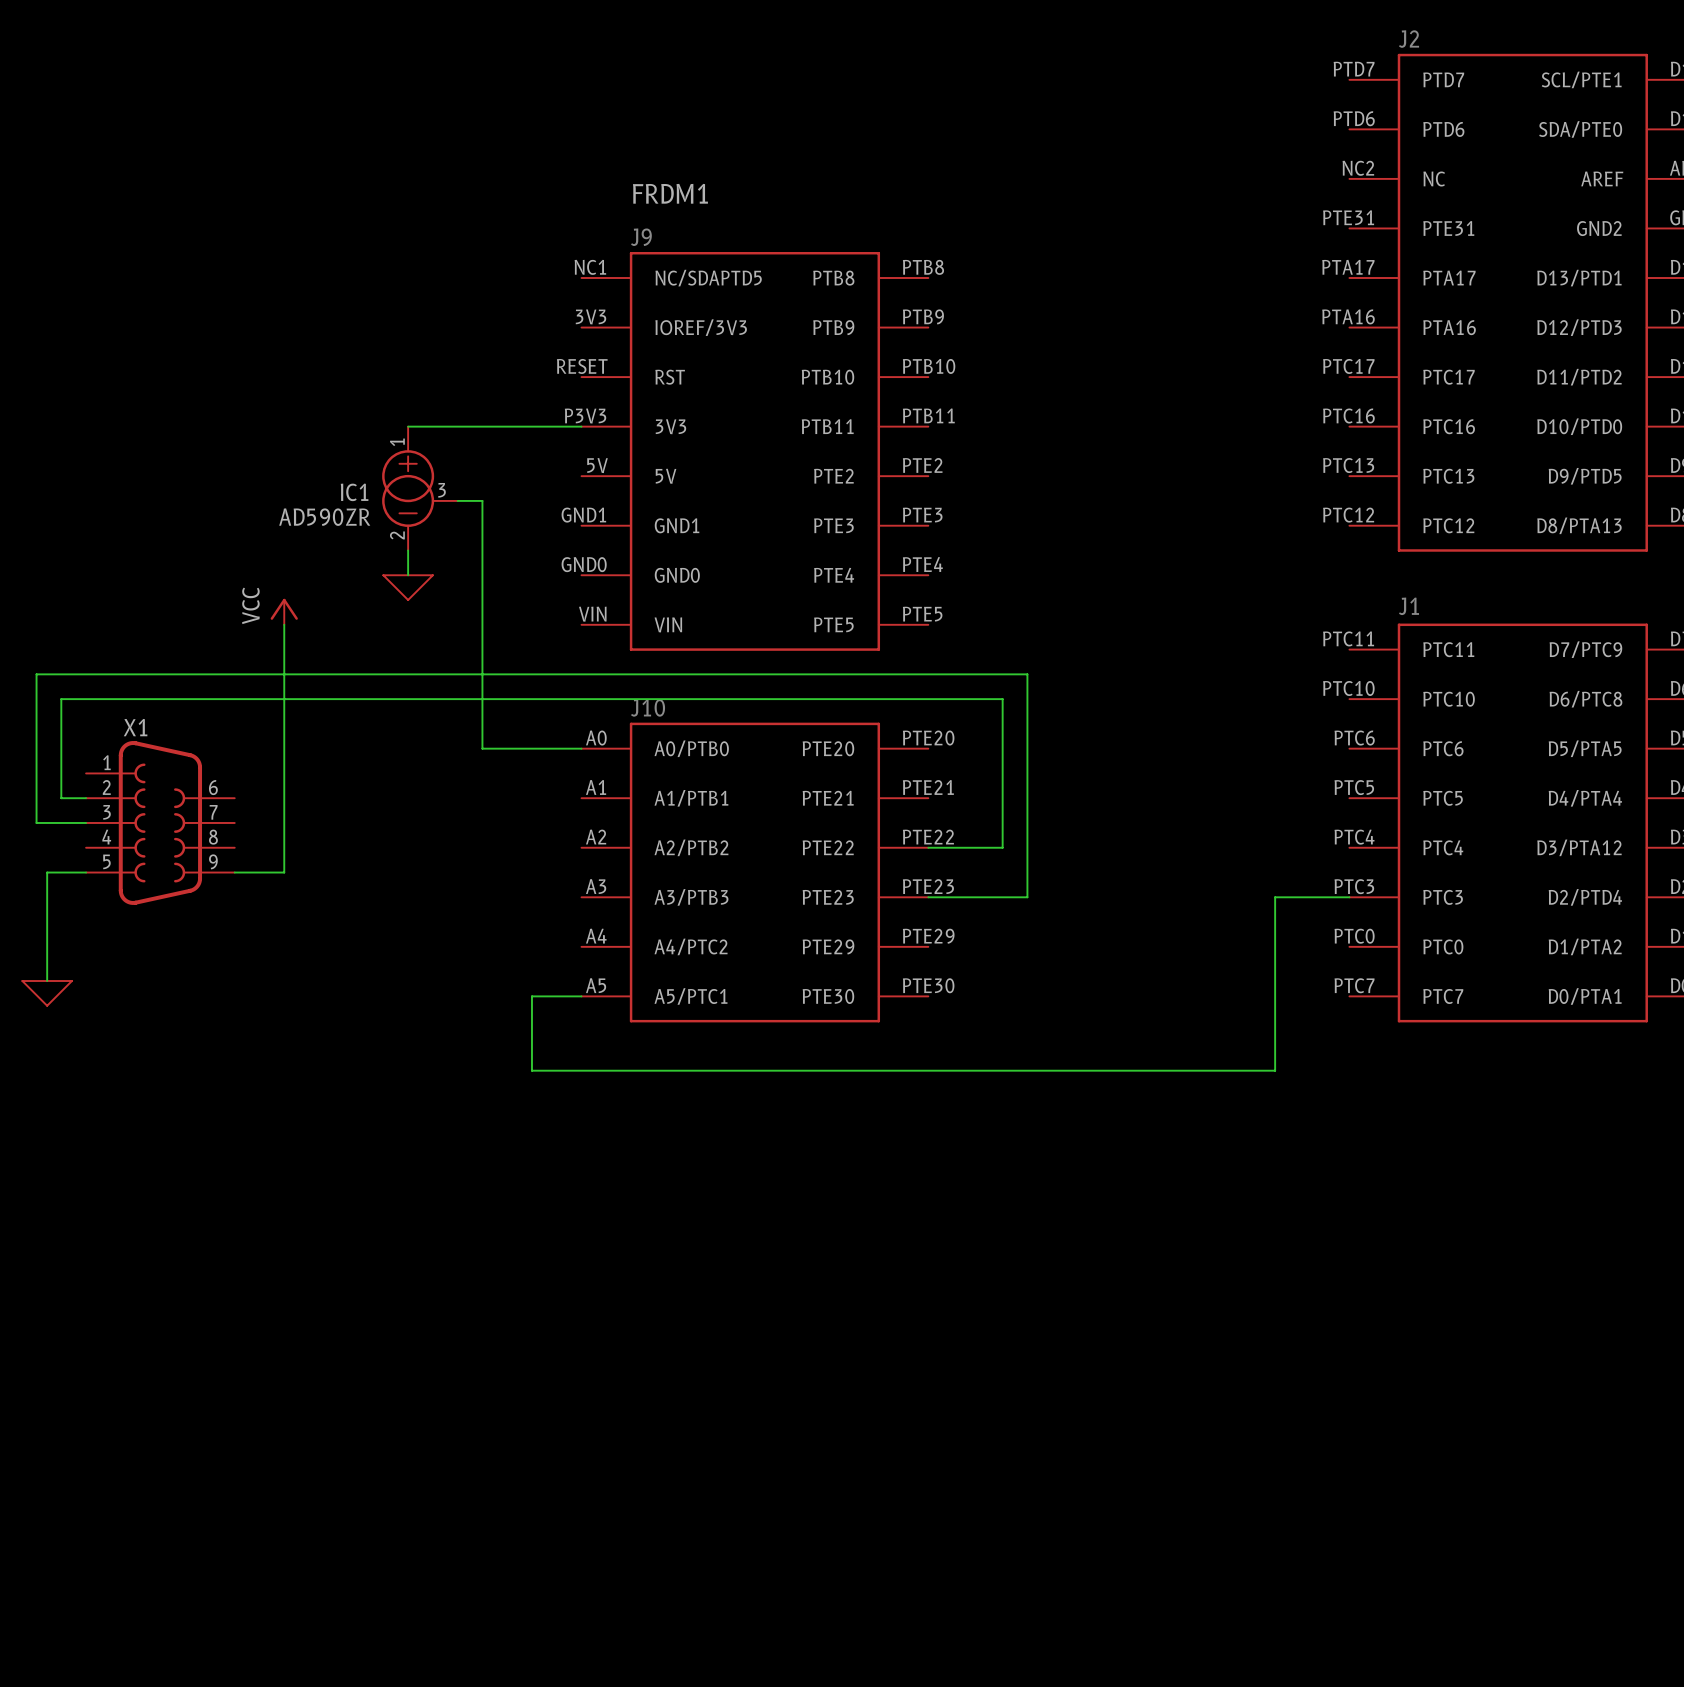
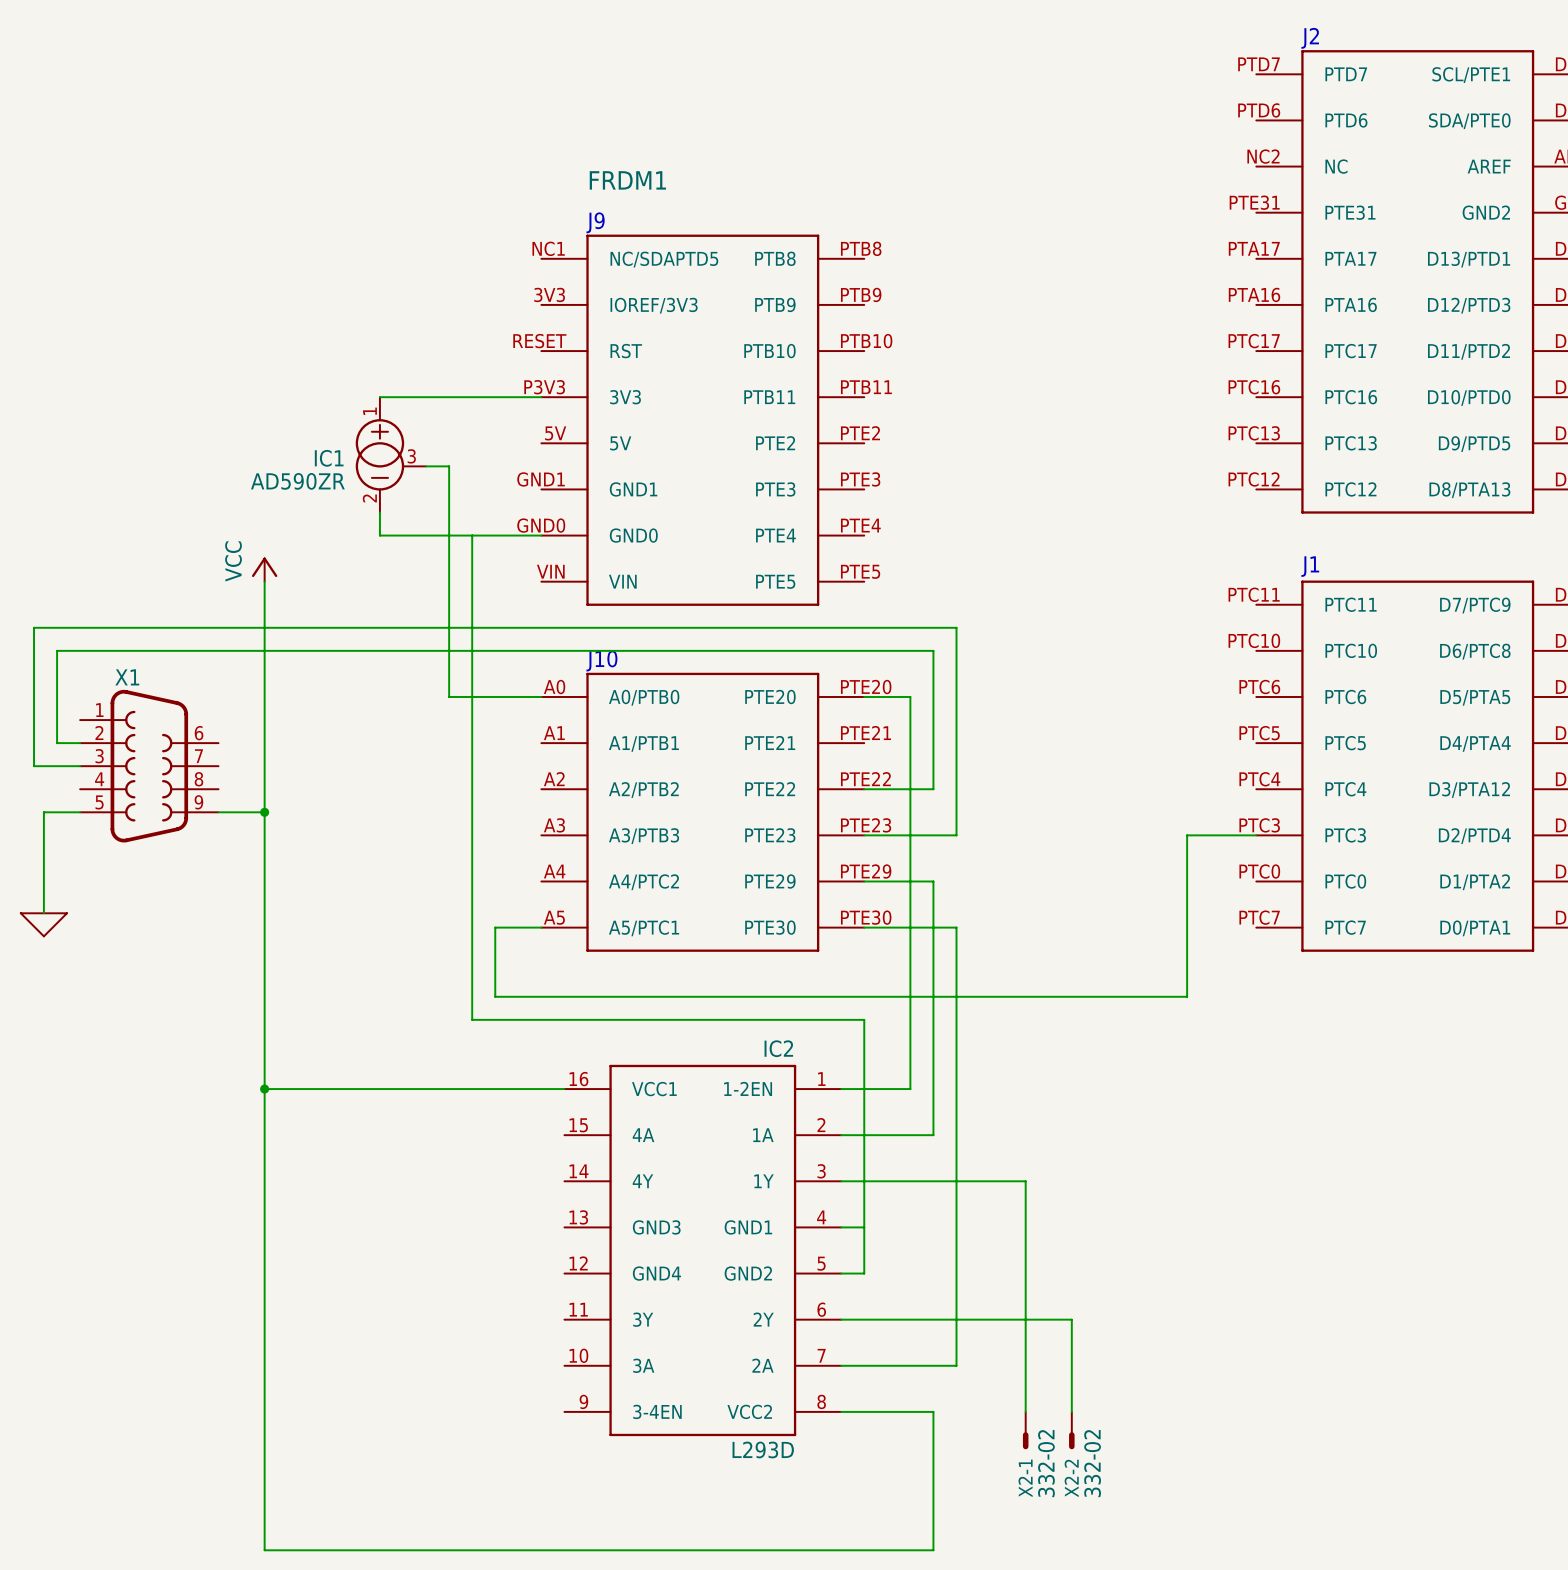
wire: none -> (379, 535) (541, 535)
wire: none -> (472, 535) (472, 1019) (864, 1019) (864, 1273) (841, 1273)
power symbol: (408, 587) -> none
wire: none -> (864, 696) (910, 696) (910, 1089) (841, 1089)
wire: none -> (264, 812) (264, 1550) (933, 1550) (933, 1411) (841, 1411)
junction: none -> (264, 812)
wire: none -> (864, 881) (933, 881) (933, 1135) (841, 1135)
wire: none -> (864, 927) (956, 927) (956, 1365) (841, 1365)
wire: none -> (264, 1089) (564, 1089)
junction: none -> (264, 1089)
wire: none -> (841, 1181) (1025, 1181) (1025, 1411)
wire: none -> (841, 1227) (864, 1227)
IC2: none -> L293D (702, 1250)
wire: none -> (841, 1319) (1071, 1319) (1071, 1411)
X2-1: none -> 332-02 (1025, 1430)
X2-2: none -> 332-02 (1071, 1430)

